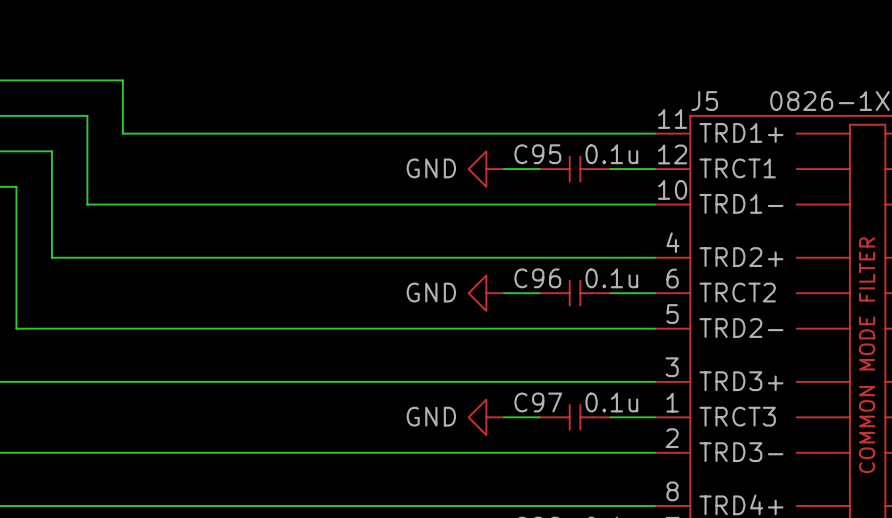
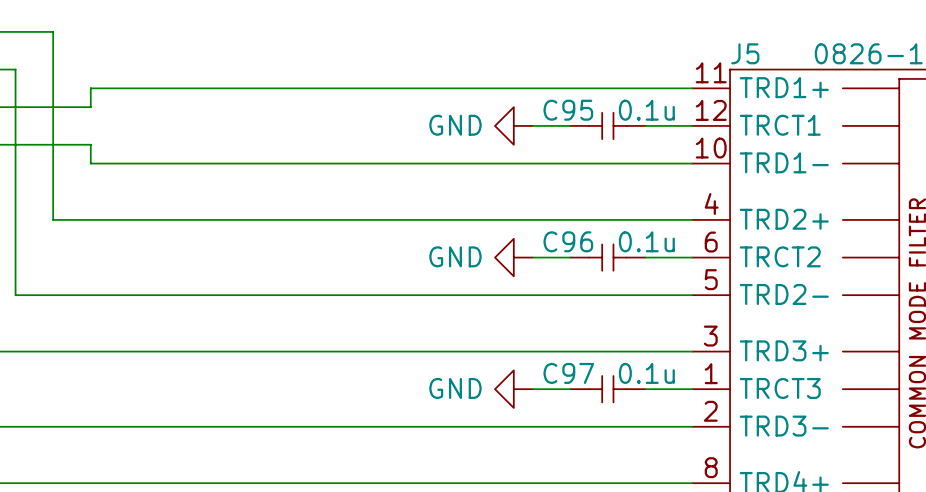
wire: (51, 80) (122, 80) (122, 133) -> (53, 31) (53, 107) (90, 107)
wire: (16, 115) (87, 115) (87, 133) -> (15, 69) (15, 144) (90, 144)
wire: none -> (90, 88) (128, 88)
wire: (87, 151) (87, 186) -> none

